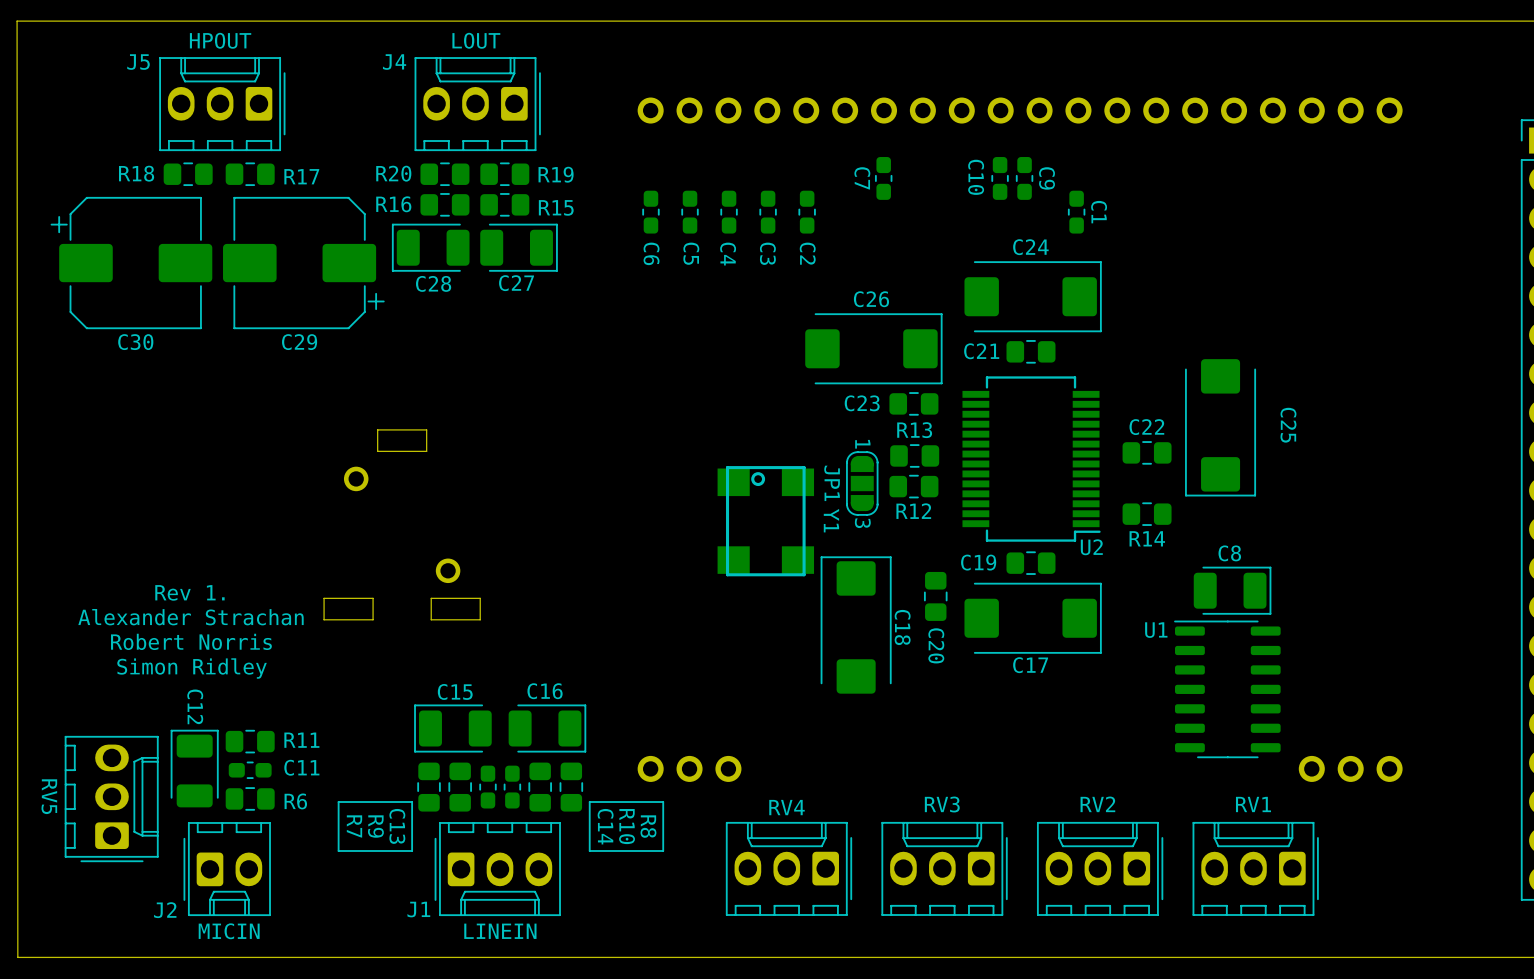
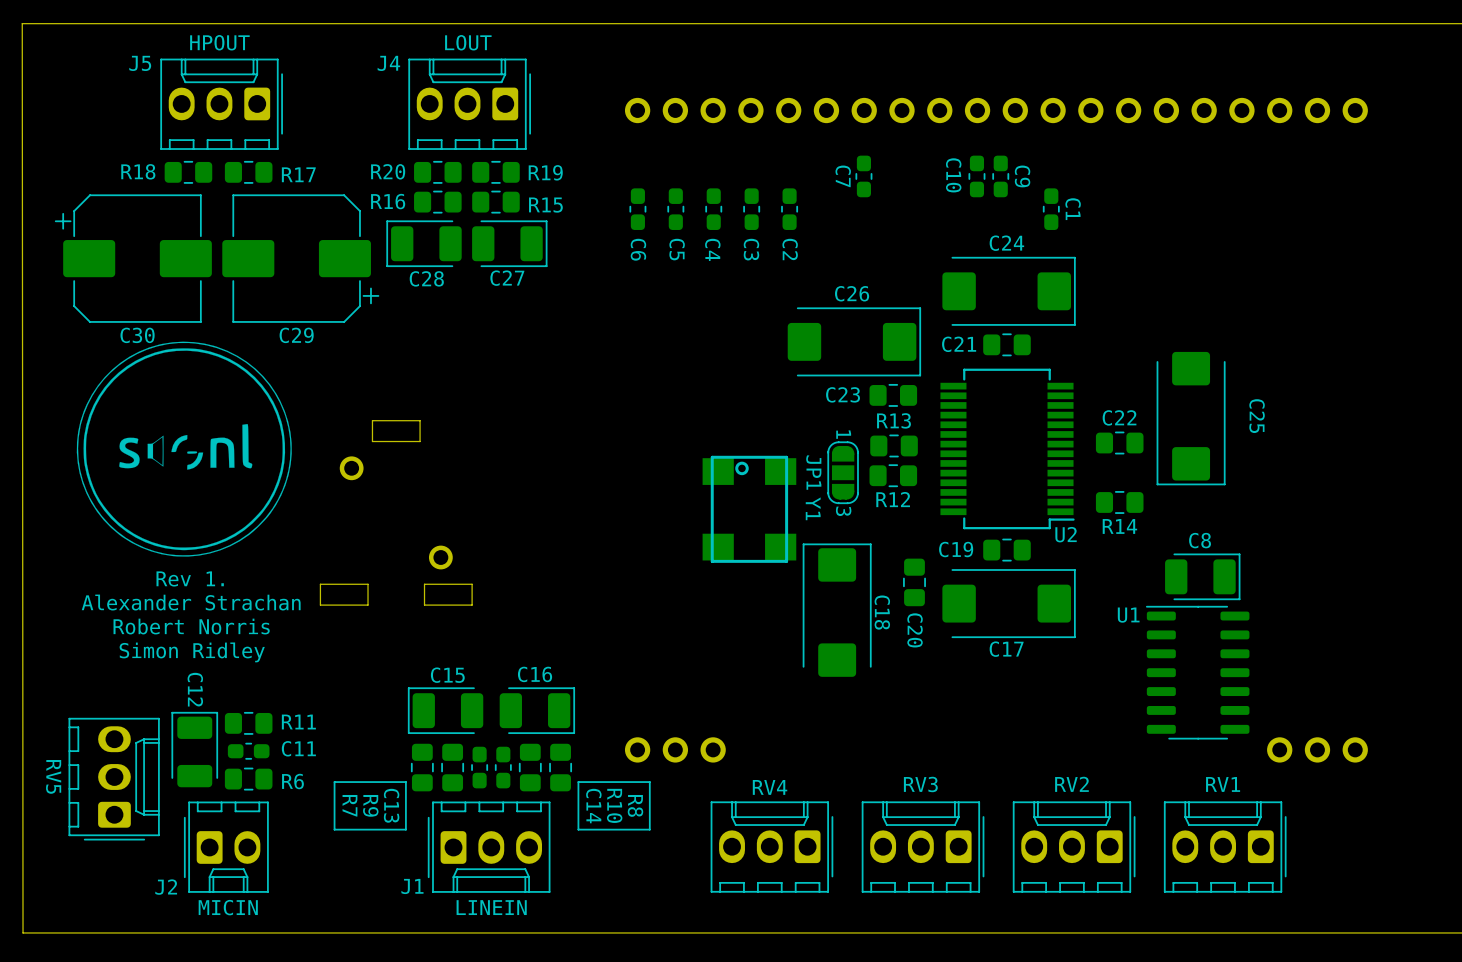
drawing: none -> [76, 341, 292, 557]

